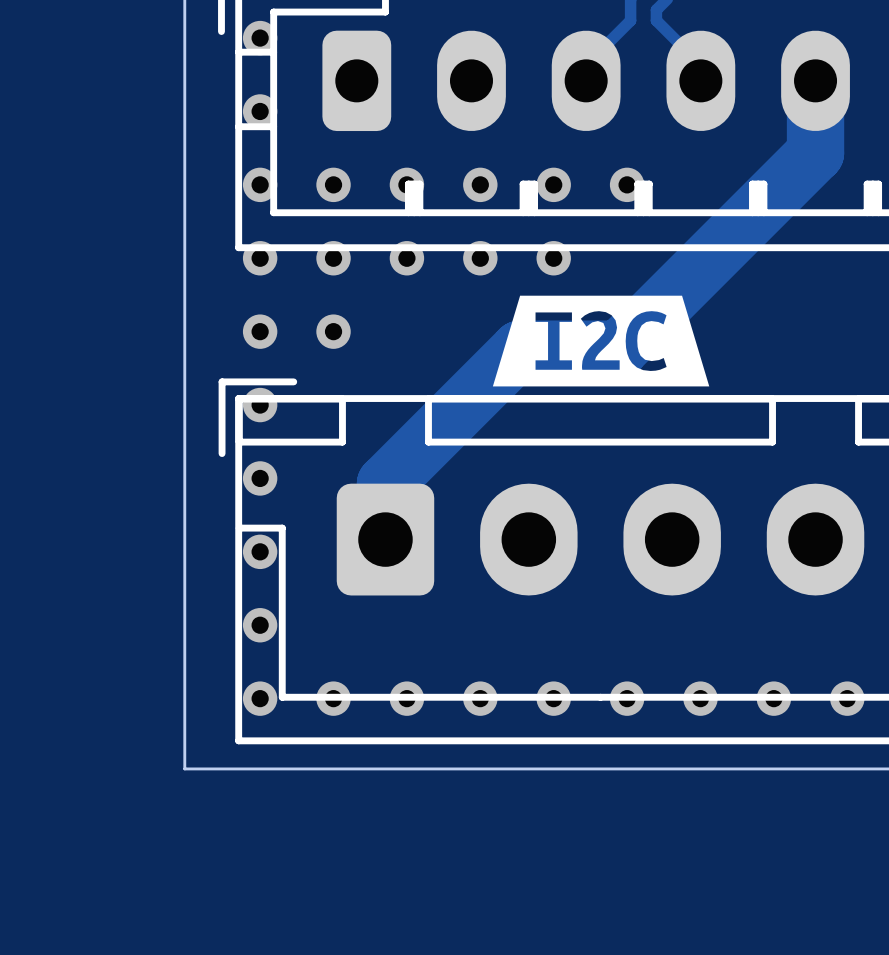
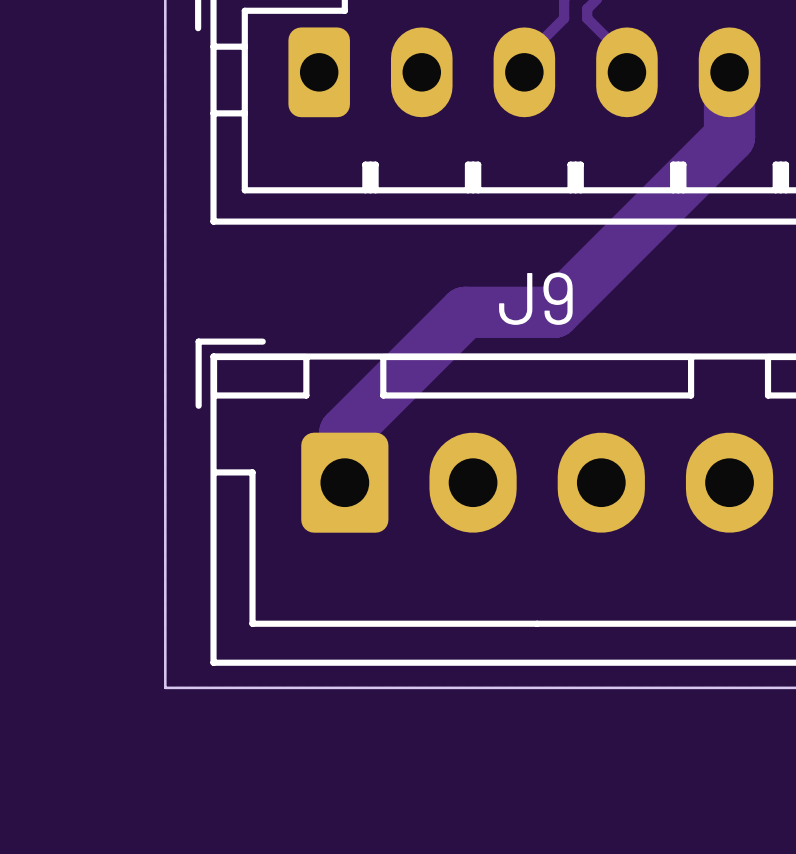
via: (260, 38) -> none
via: (260, 111) -> none
via: (260, 184) -> none
via: (333, 184) -> none
via: (406, 184) -> none
via: (480, 184) -> none
via: (553, 184) -> none
via: (627, 184) -> none
via: (260, 258) -> none
via: (333, 258) -> none
via: (406, 258) -> none
via: (480, 258) -> none
via: (553, 258) -> none
drawing: [492, 295, 710, 387] -> none
via: (260, 331) -> none
via: (333, 331) -> none
J9 name: none -> J9 (535, 298)
via: (260, 405) -> none
via: (260, 478) -> none
via: (260, 551) -> none
via: (260, 625) -> none
via: (260, 698) -> none
via: (333, 698) -> none
via: (406, 698) -> none
via: (480, 698) -> none
via: (553, 698) -> none
via: (627, 698) -> none
via: (700, 698) -> none
via: (773, 698) -> none
via: (847, 698) -> none

